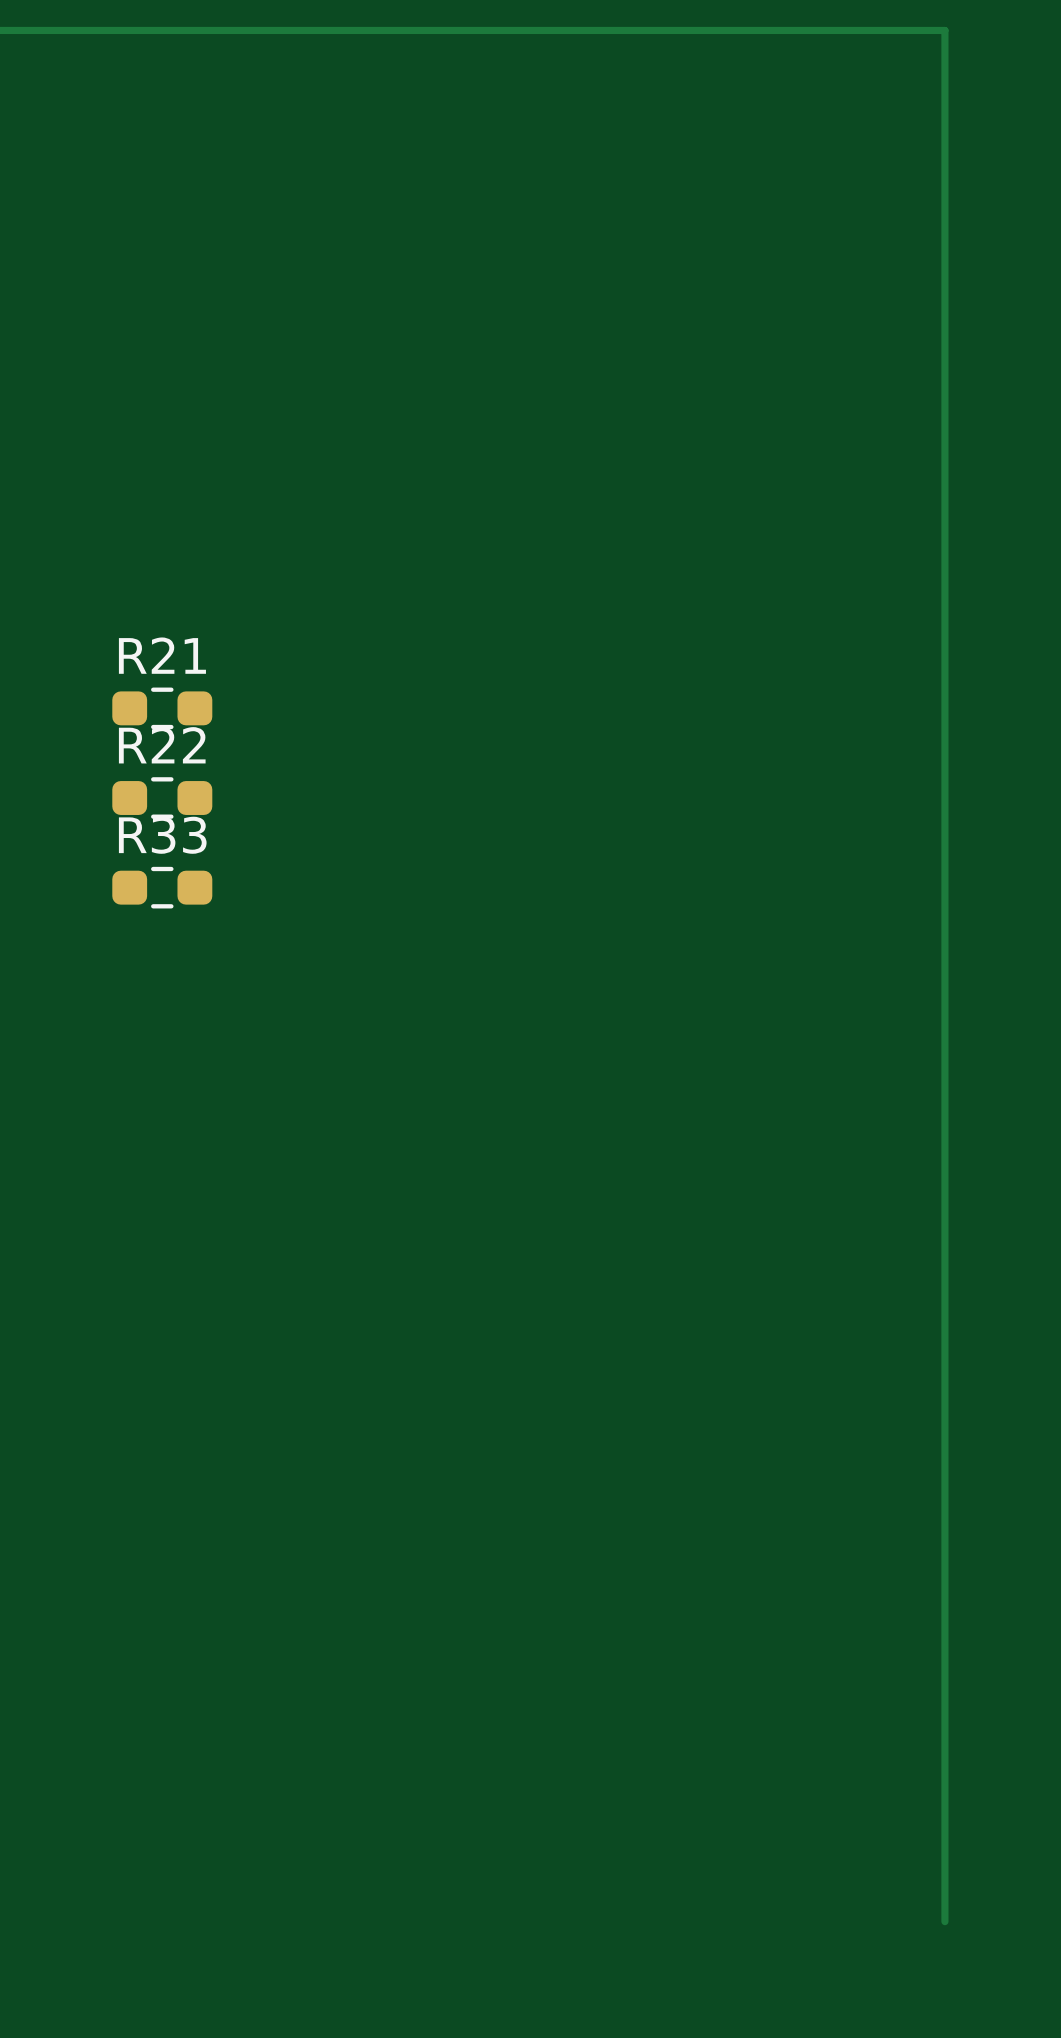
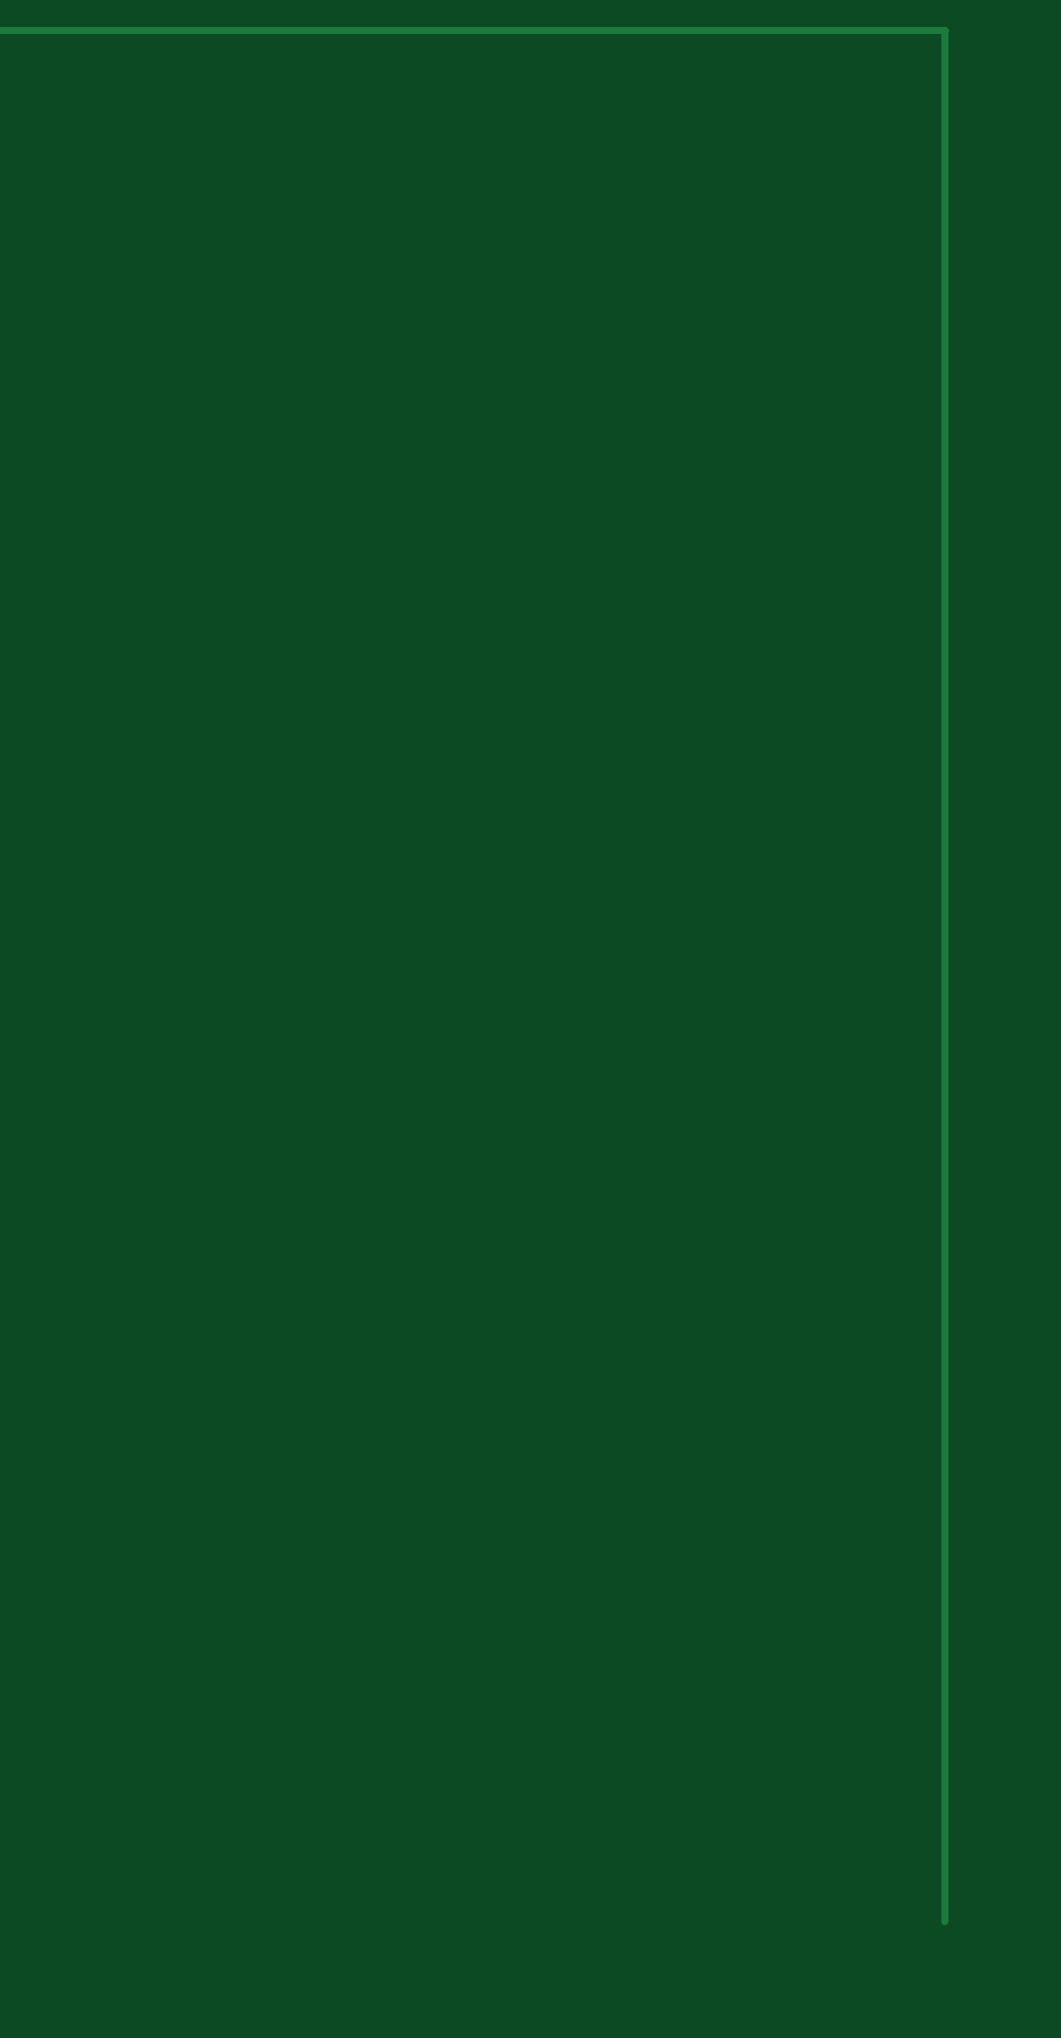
R21: (162, 708) -> none
R22: (162, 798) -> none
R33: (162, 887) -> none

